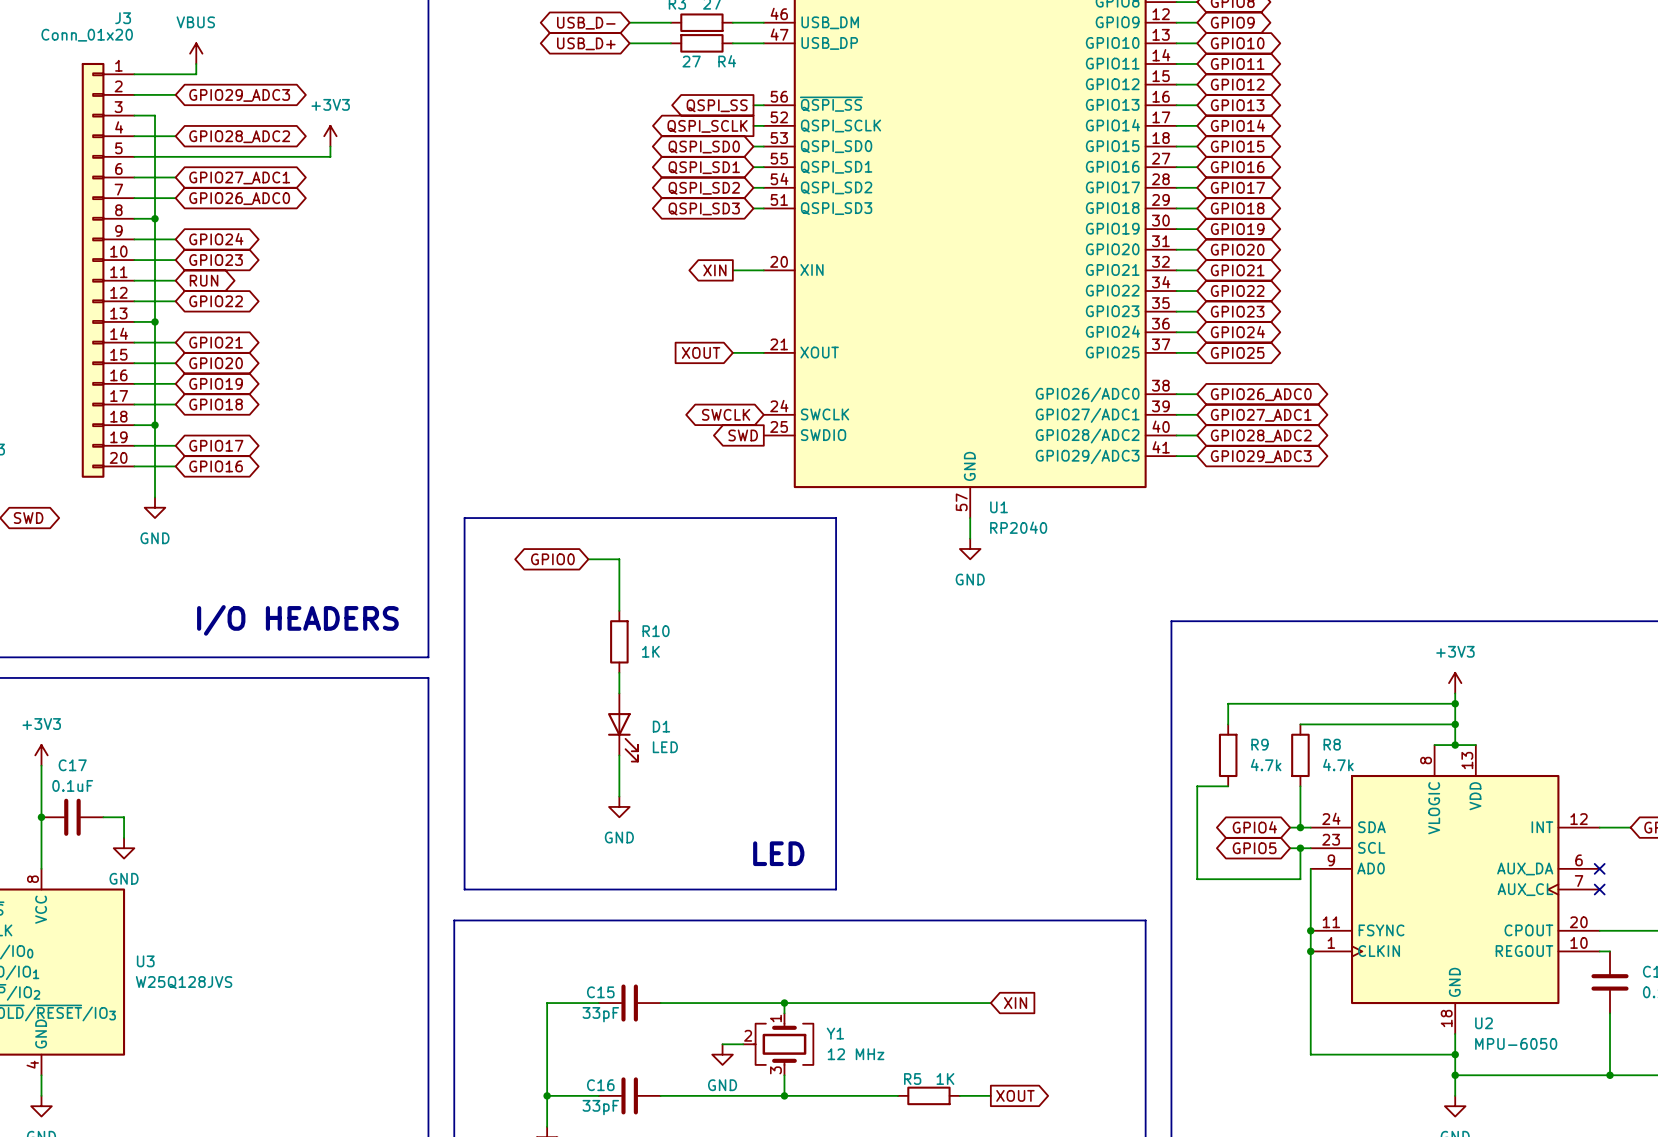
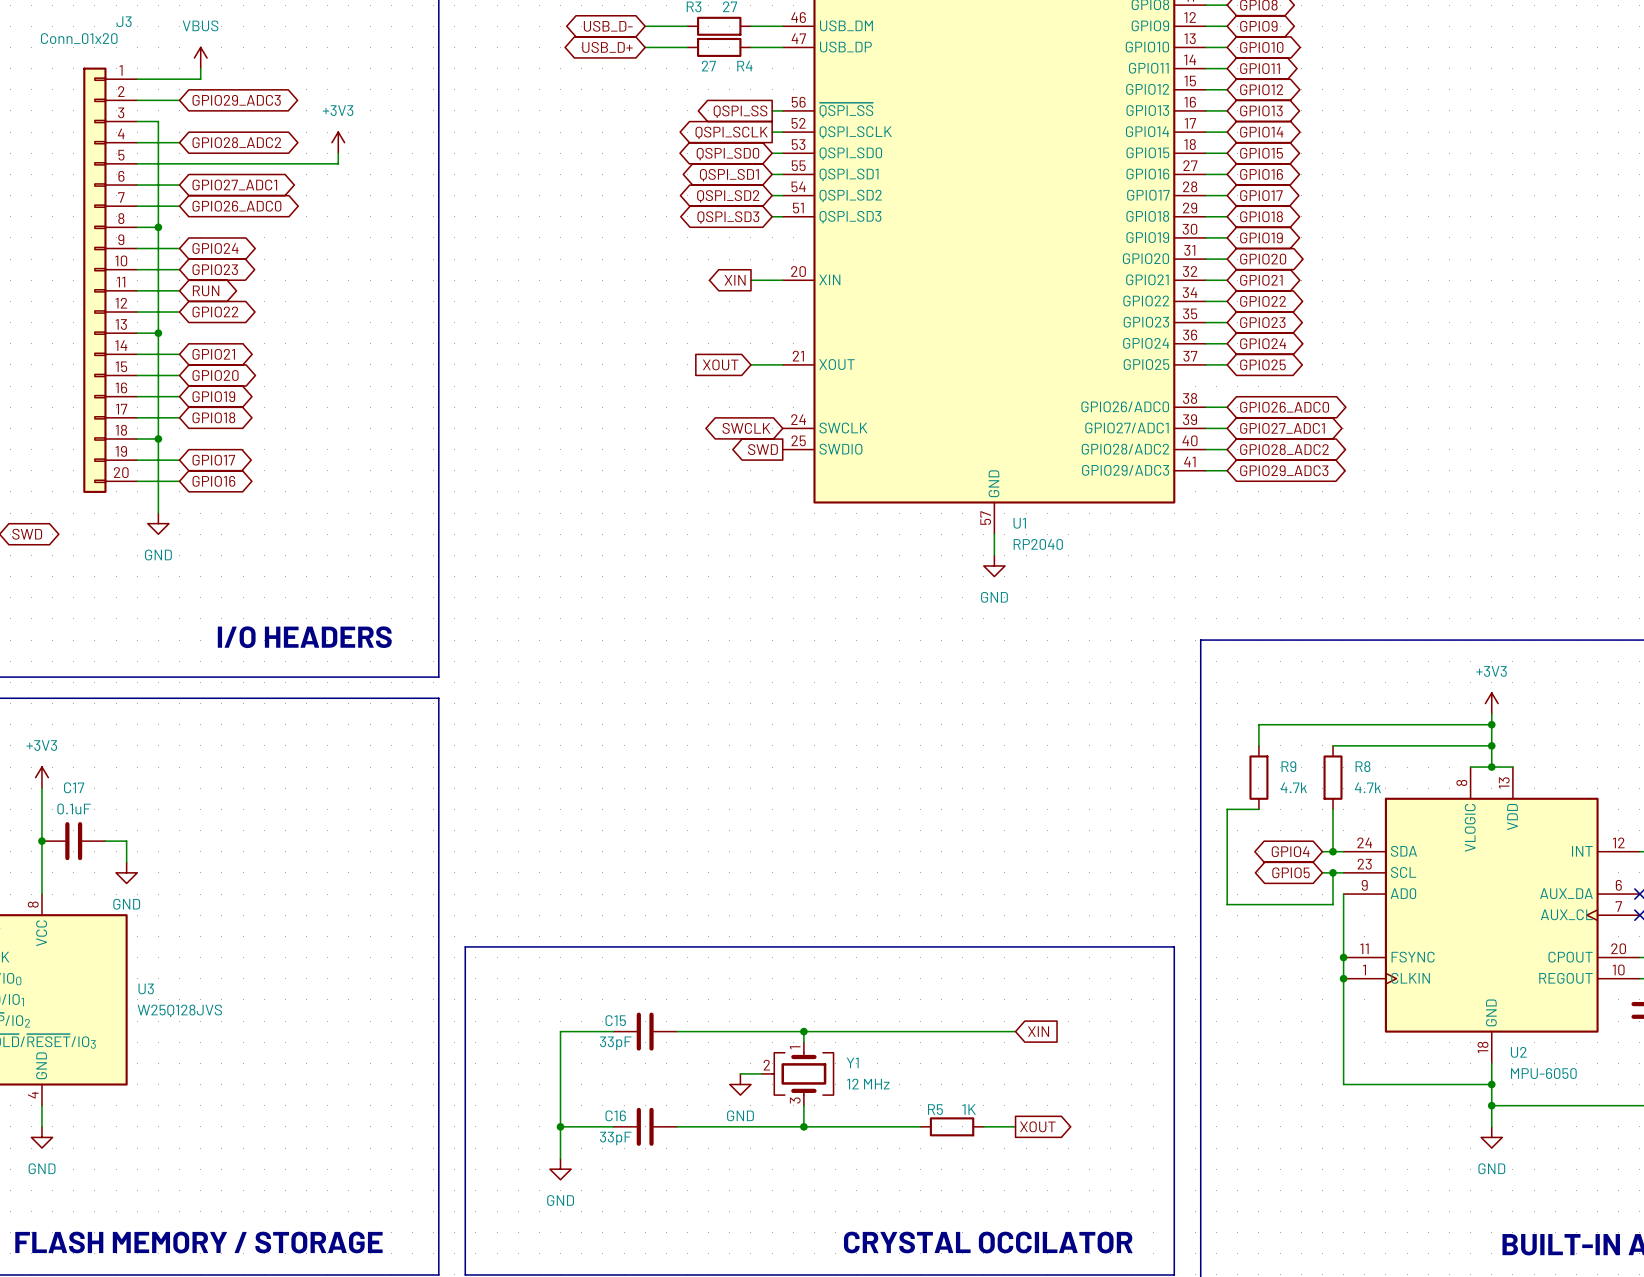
line: (464, 518) (836, 518) (836, 889) (464, 889) (464, 518) -> none
global label: GPIO0 (552, 559) -> none
wire: (588, 559) (619, 559) (619, 610) -> none
R10: 1K (619, 641) -> none
wire: (619, 672) (619, 693) -> none
D1: LED (622, 727) -> none
wire: (619, 755) (619, 796) -> none
power symbol: GND (619, 806) -> none
text: LED (778, 853) -> none

